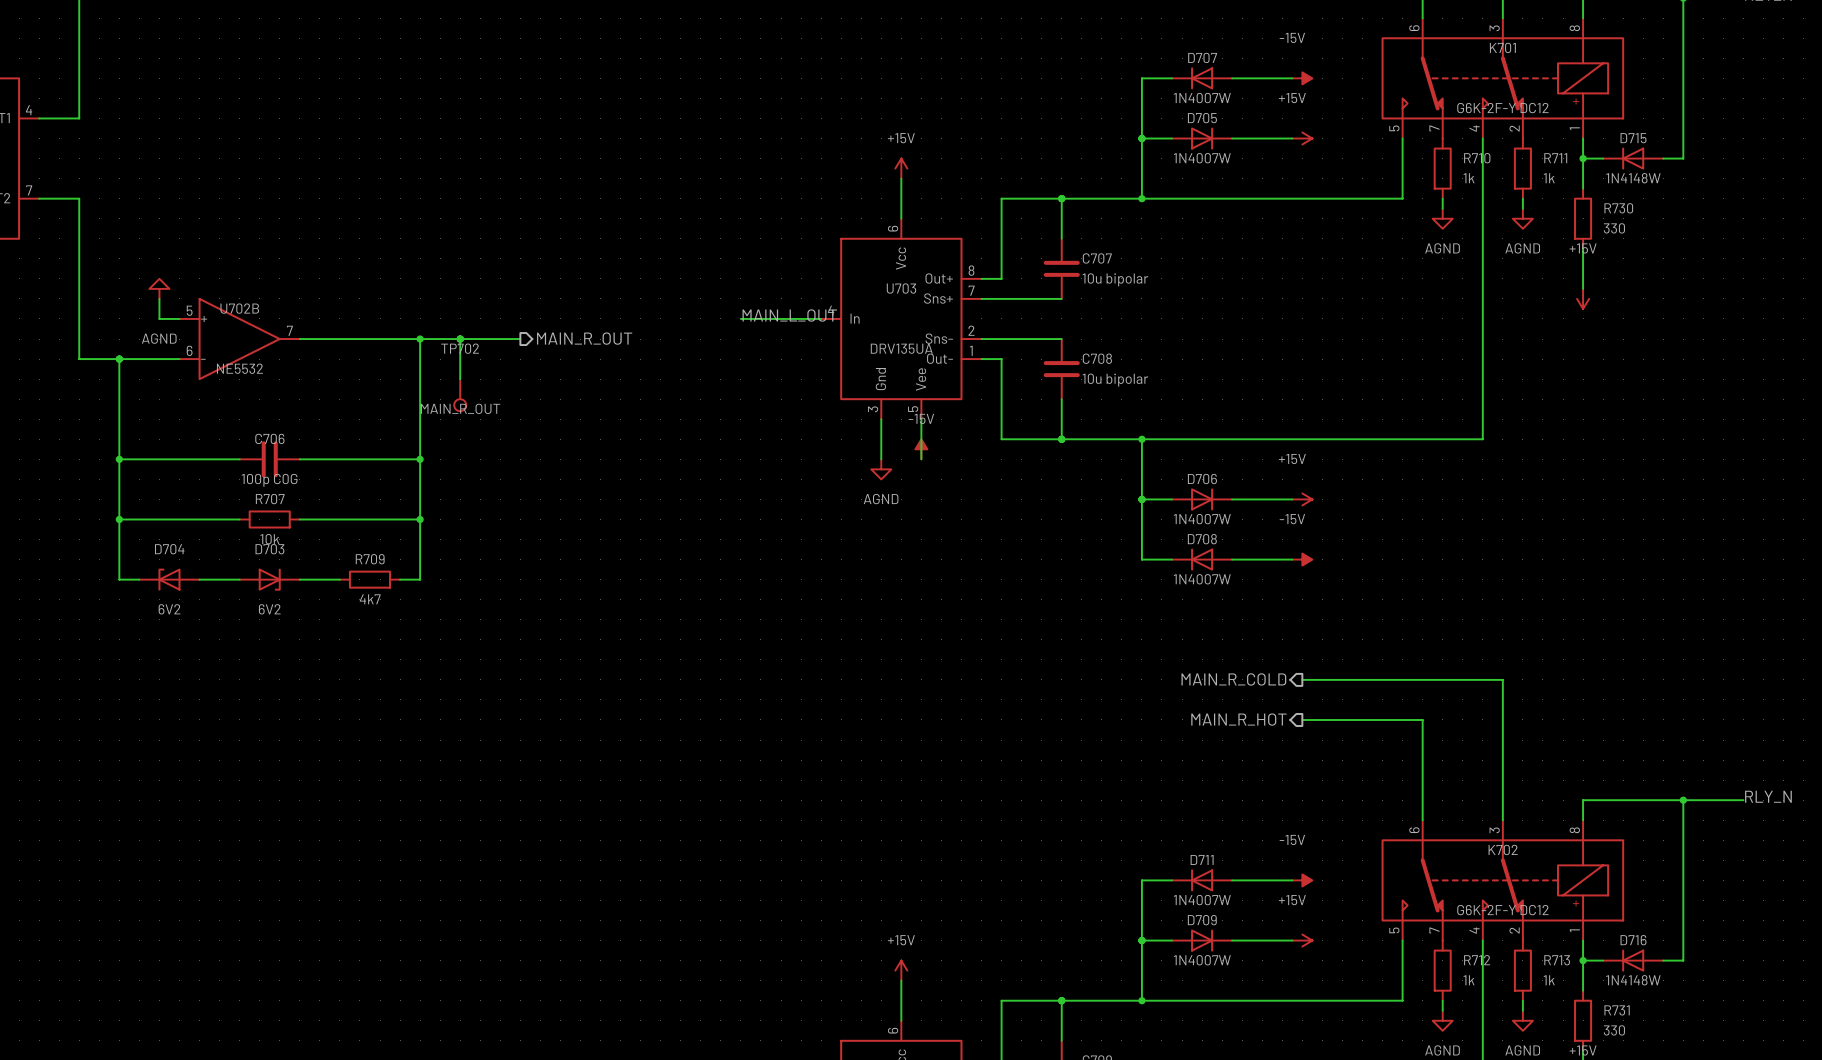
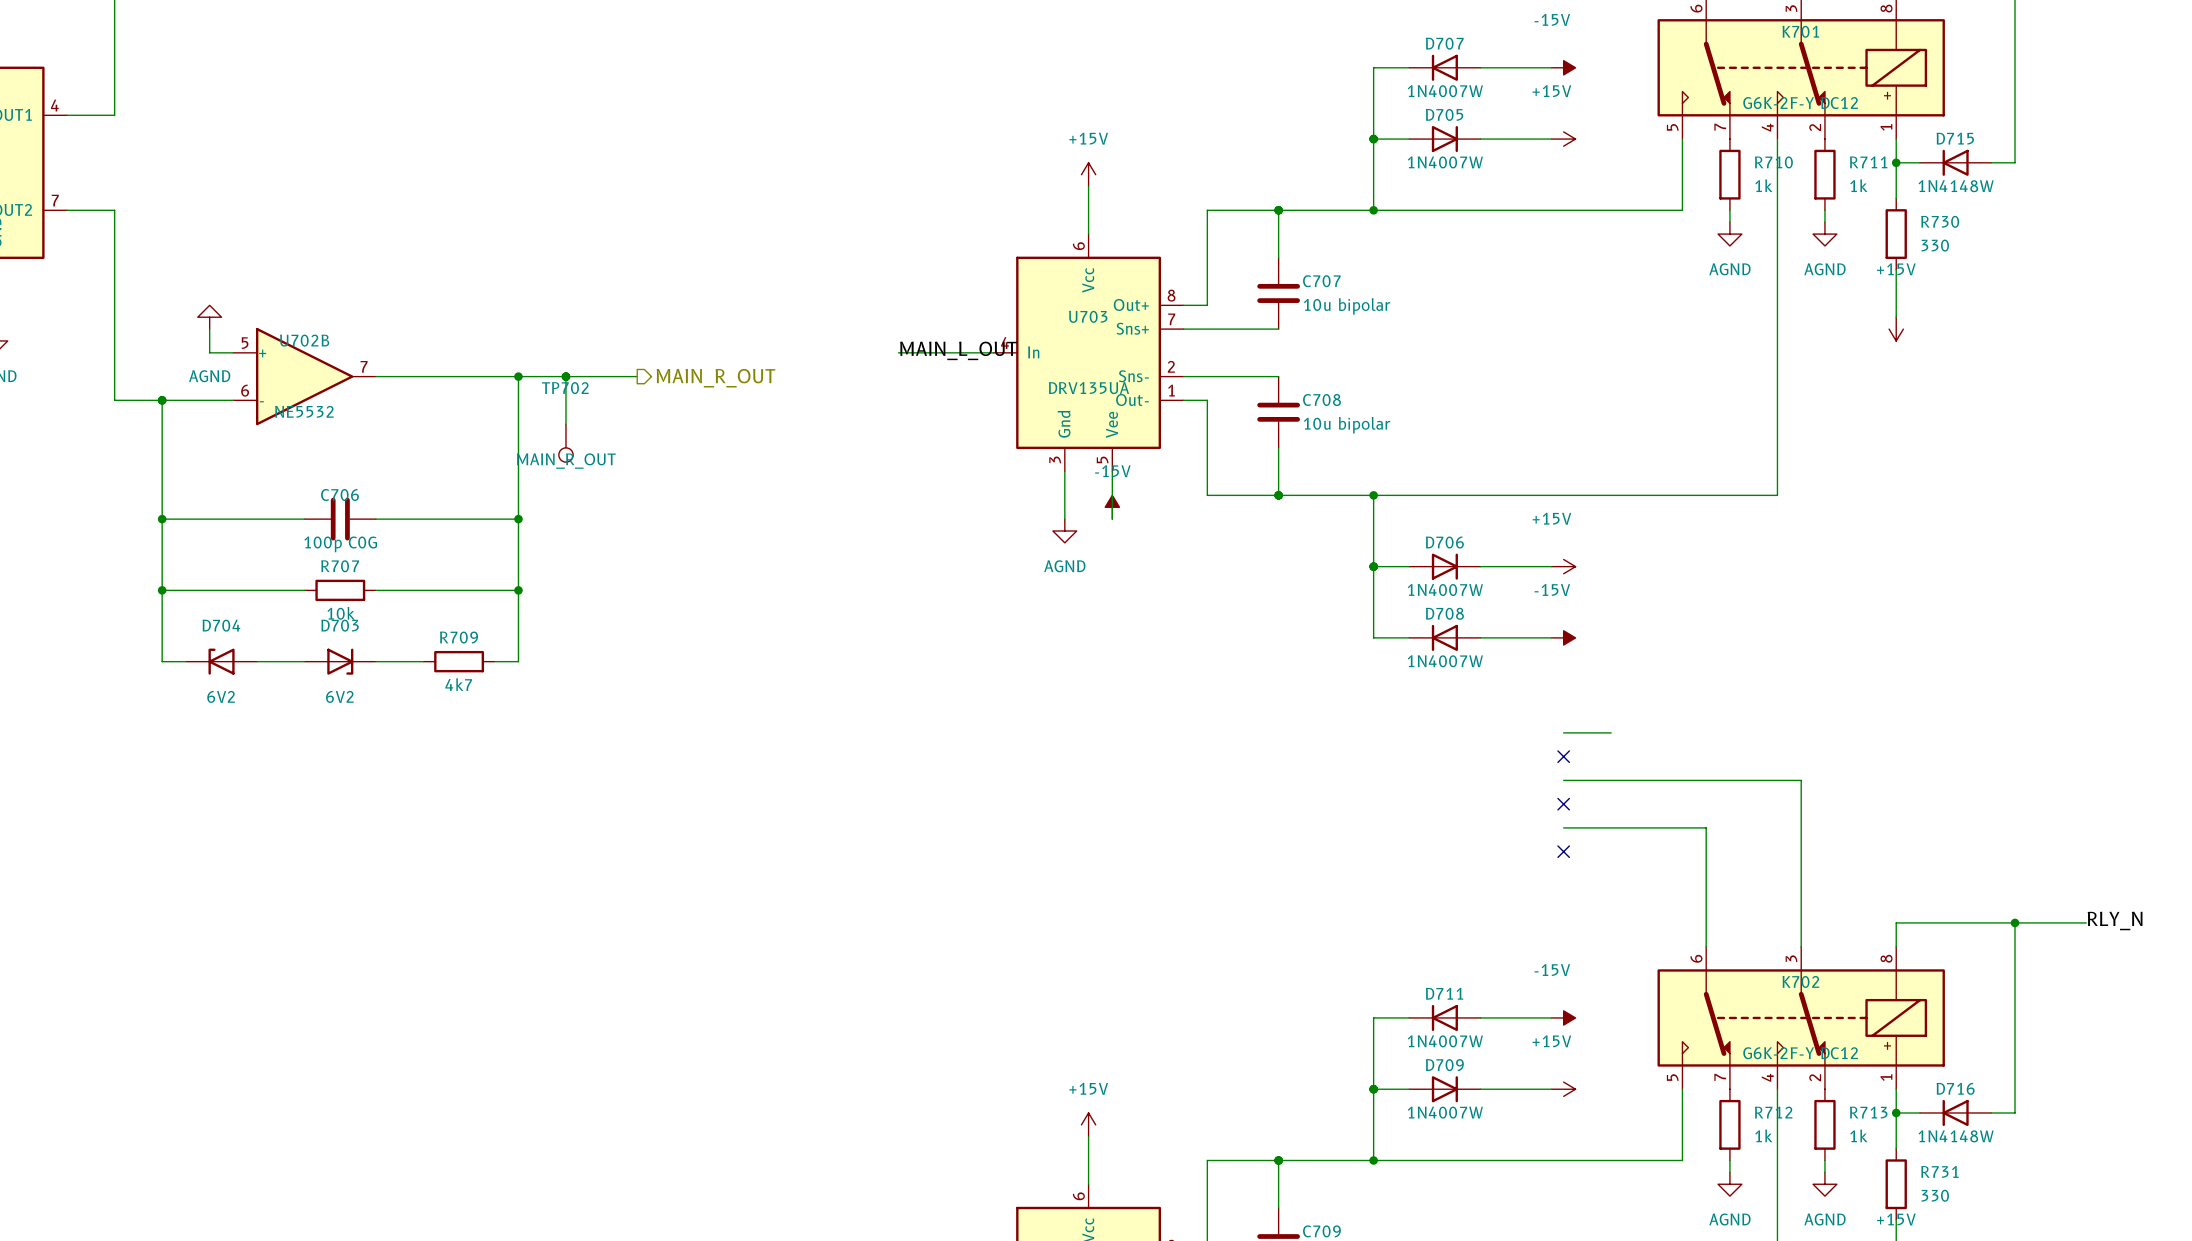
wire: none -> (1563, 732) (1611, 732)
no-connect mark: none -> (1563, 756)
hierarchical label: MAIN_R_COLD (1233, 679) -> none
no-connect mark: none -> (1563, 804)
hierarchical label: MAIN_R_HOT (1238, 719) -> none
no-connect mark: none -> (1563, 851)

